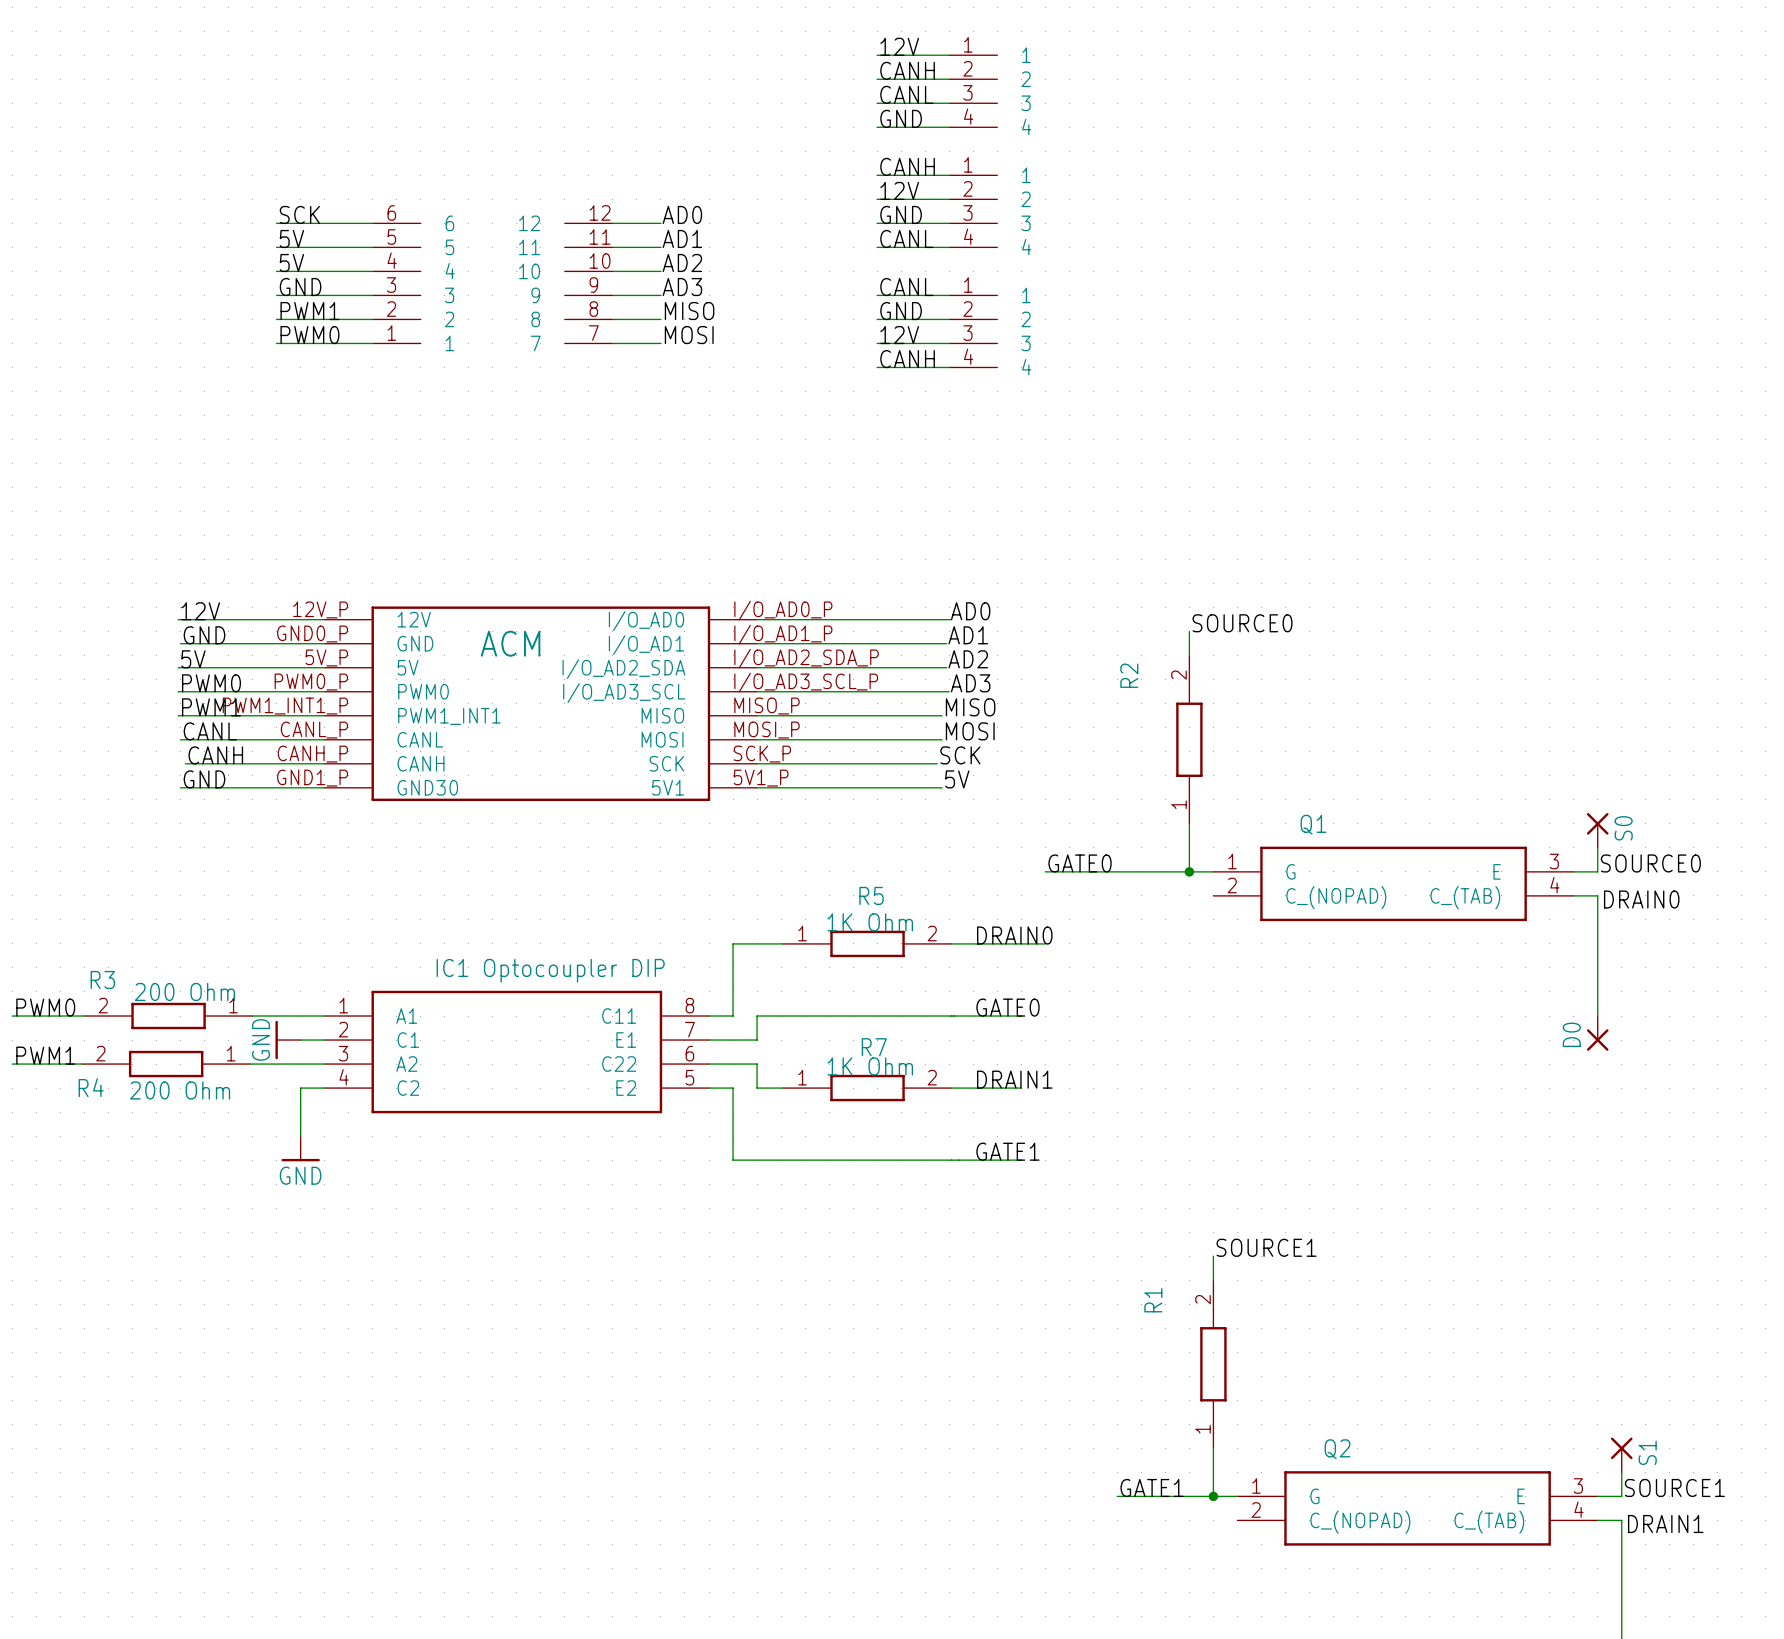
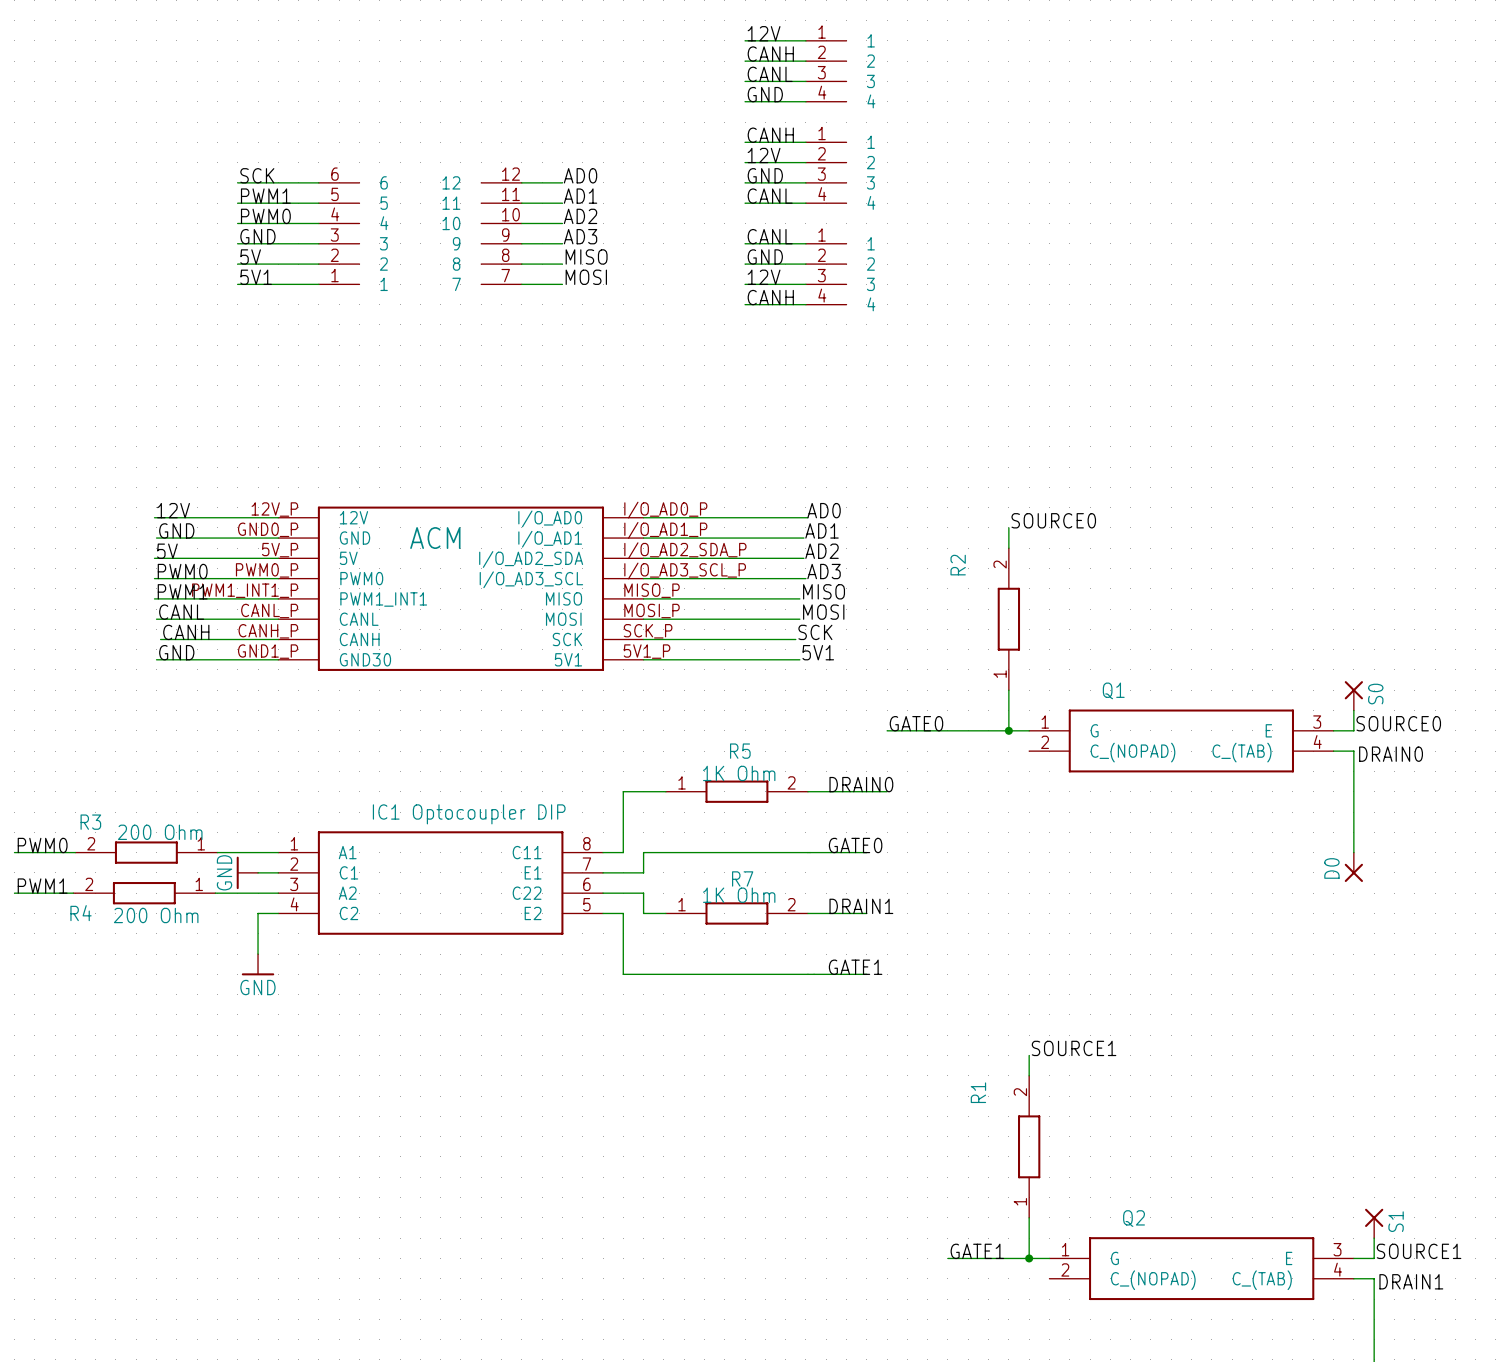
label: 5V (291, 238) -> PWM1 (265, 196)
label: 5V (291, 262) -> PWM0 (265, 216)
label: PWM1 (309, 311) -> 5V (250, 256)
label: PWM0 (309, 335) -> 5V1 (256, 277)
label: 5V (957, 779) -> 5V1 (818, 652)

